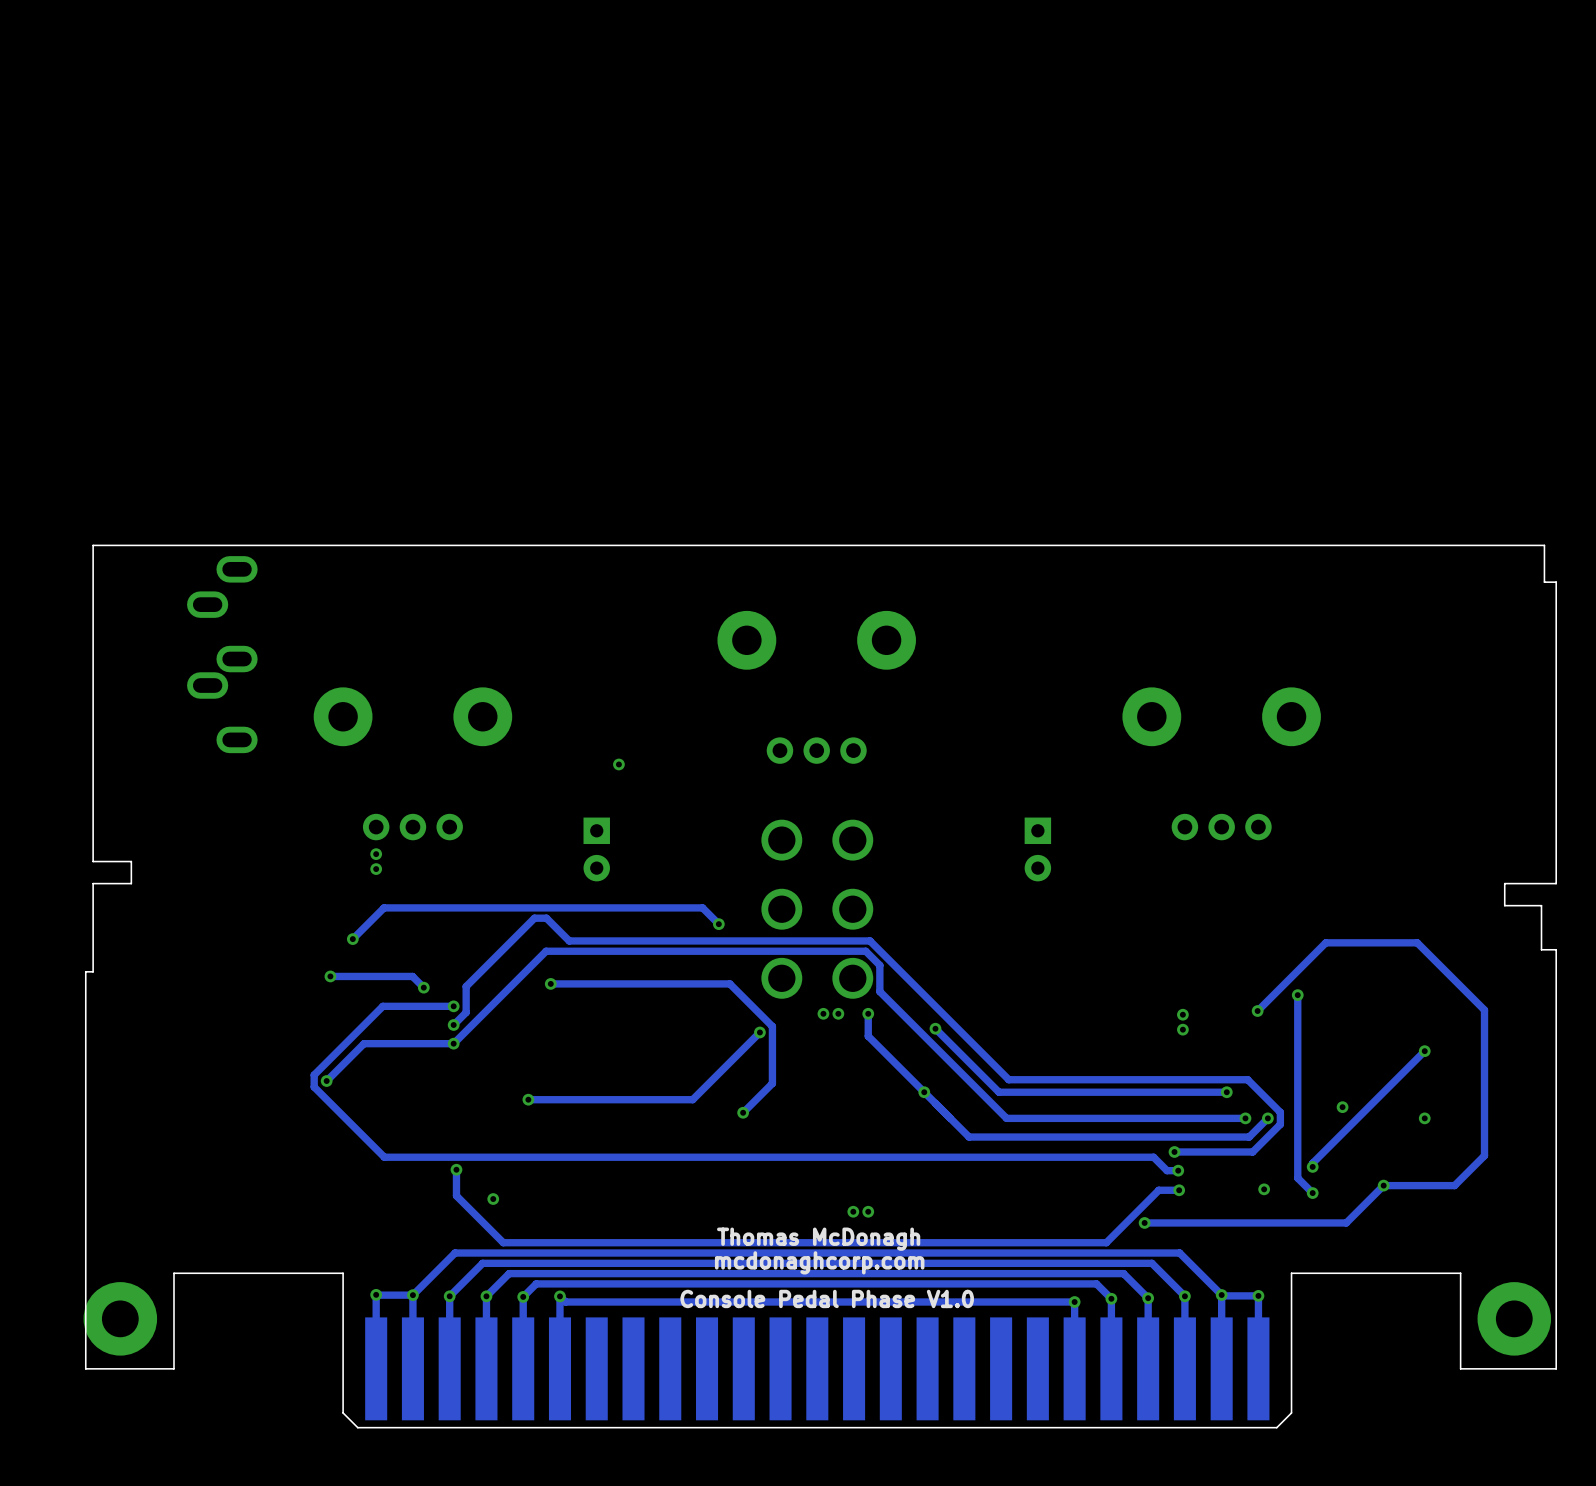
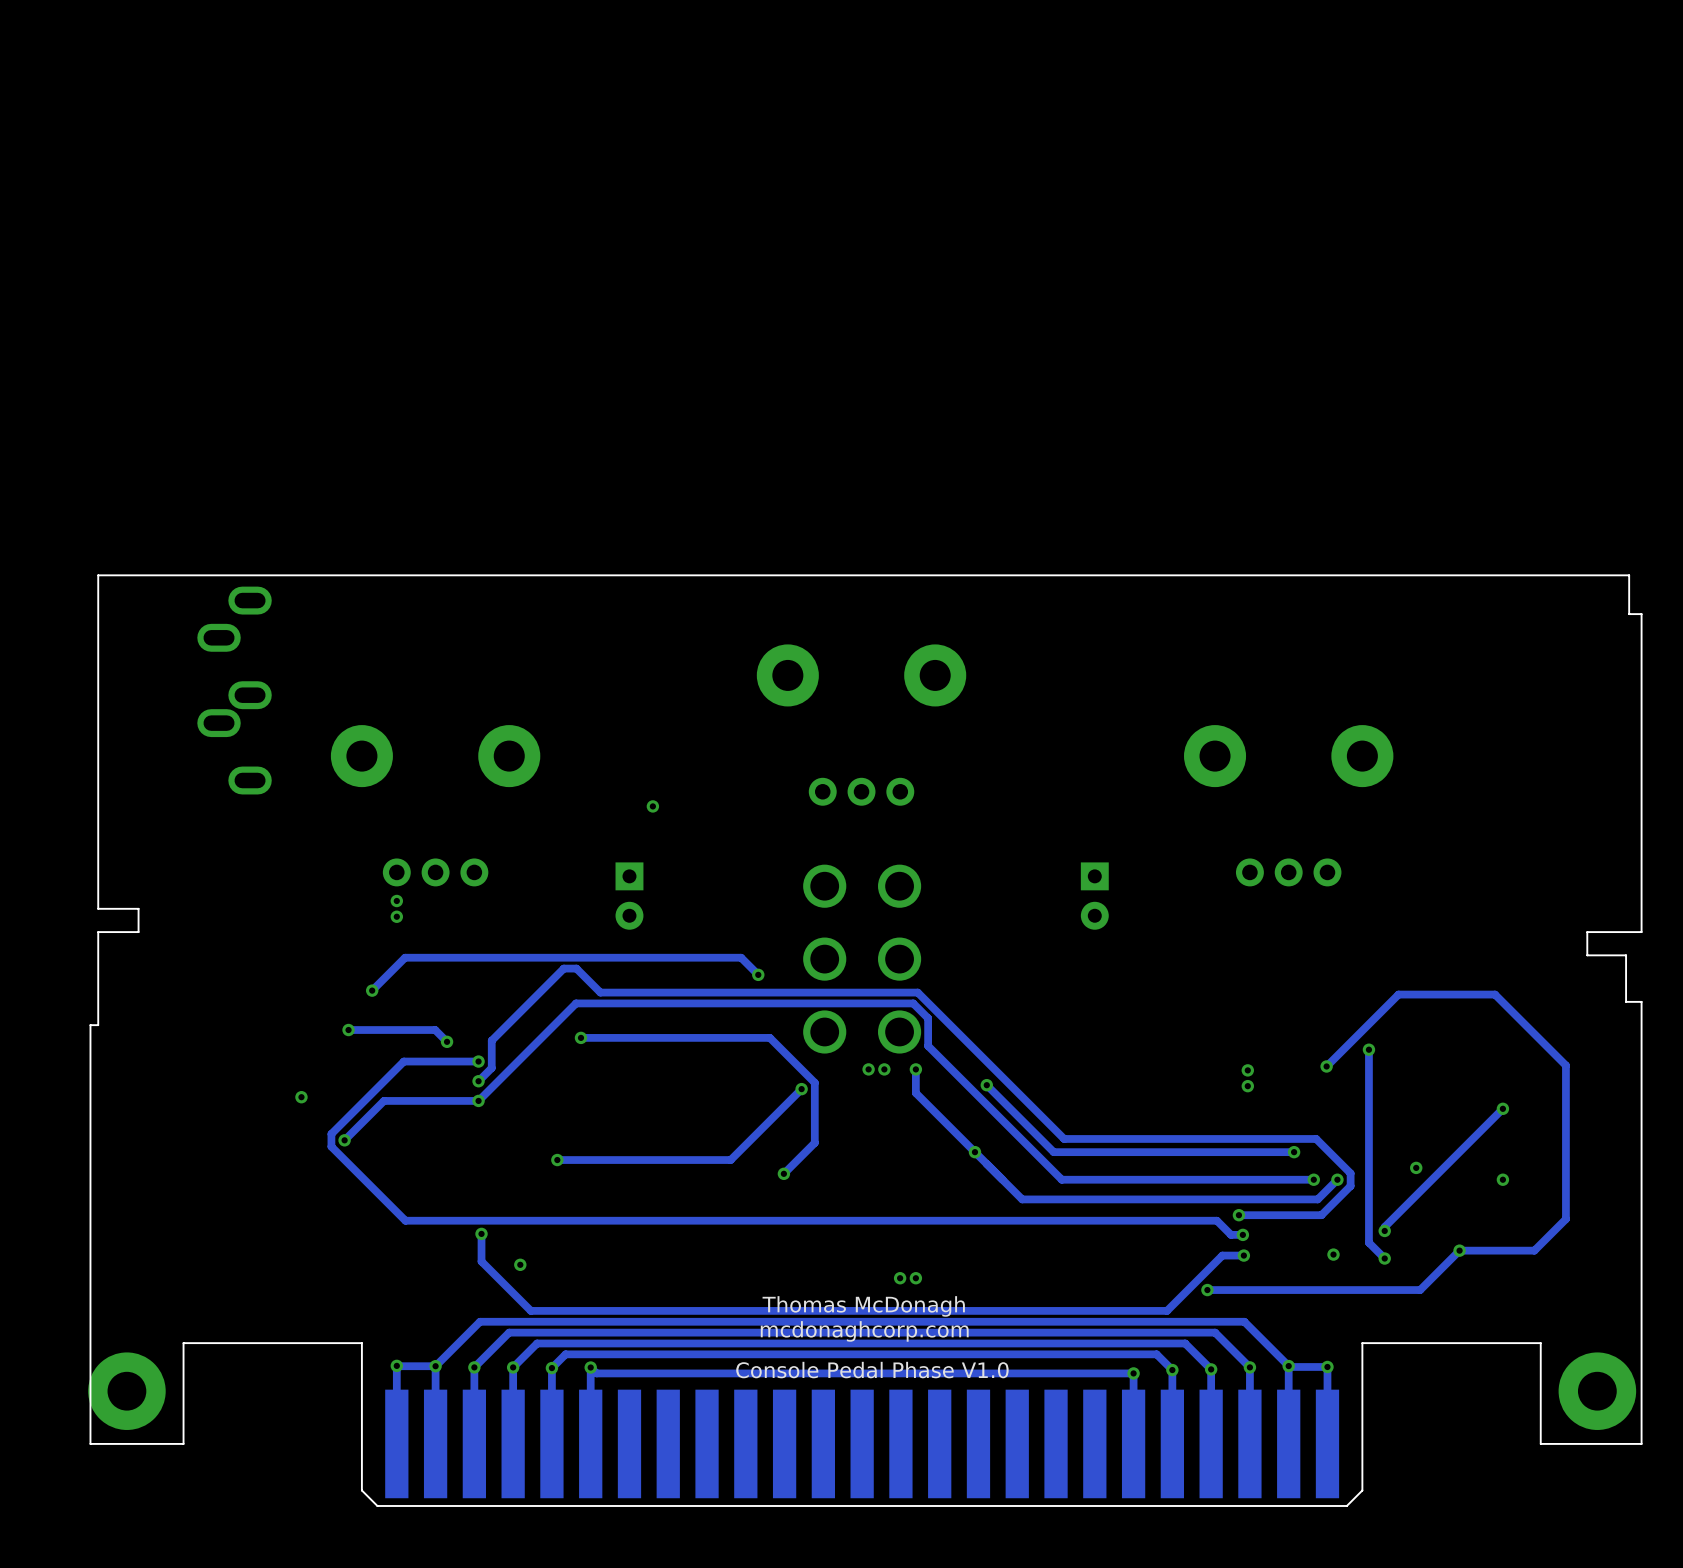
via: none -> (301, 1097)

